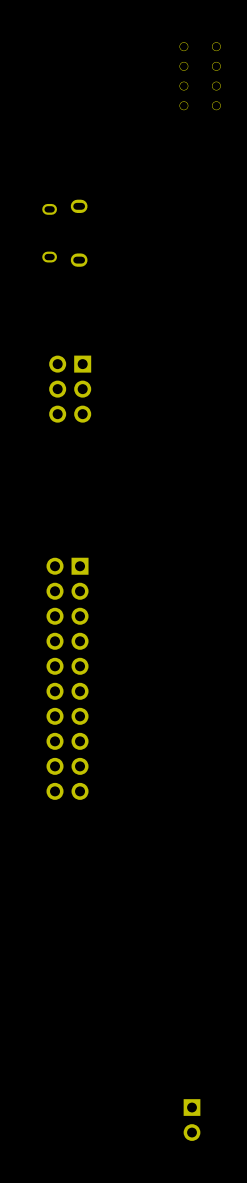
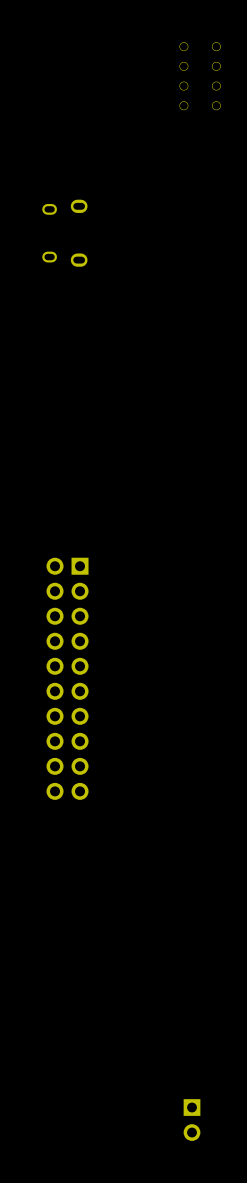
part: (70, 389) -> none

